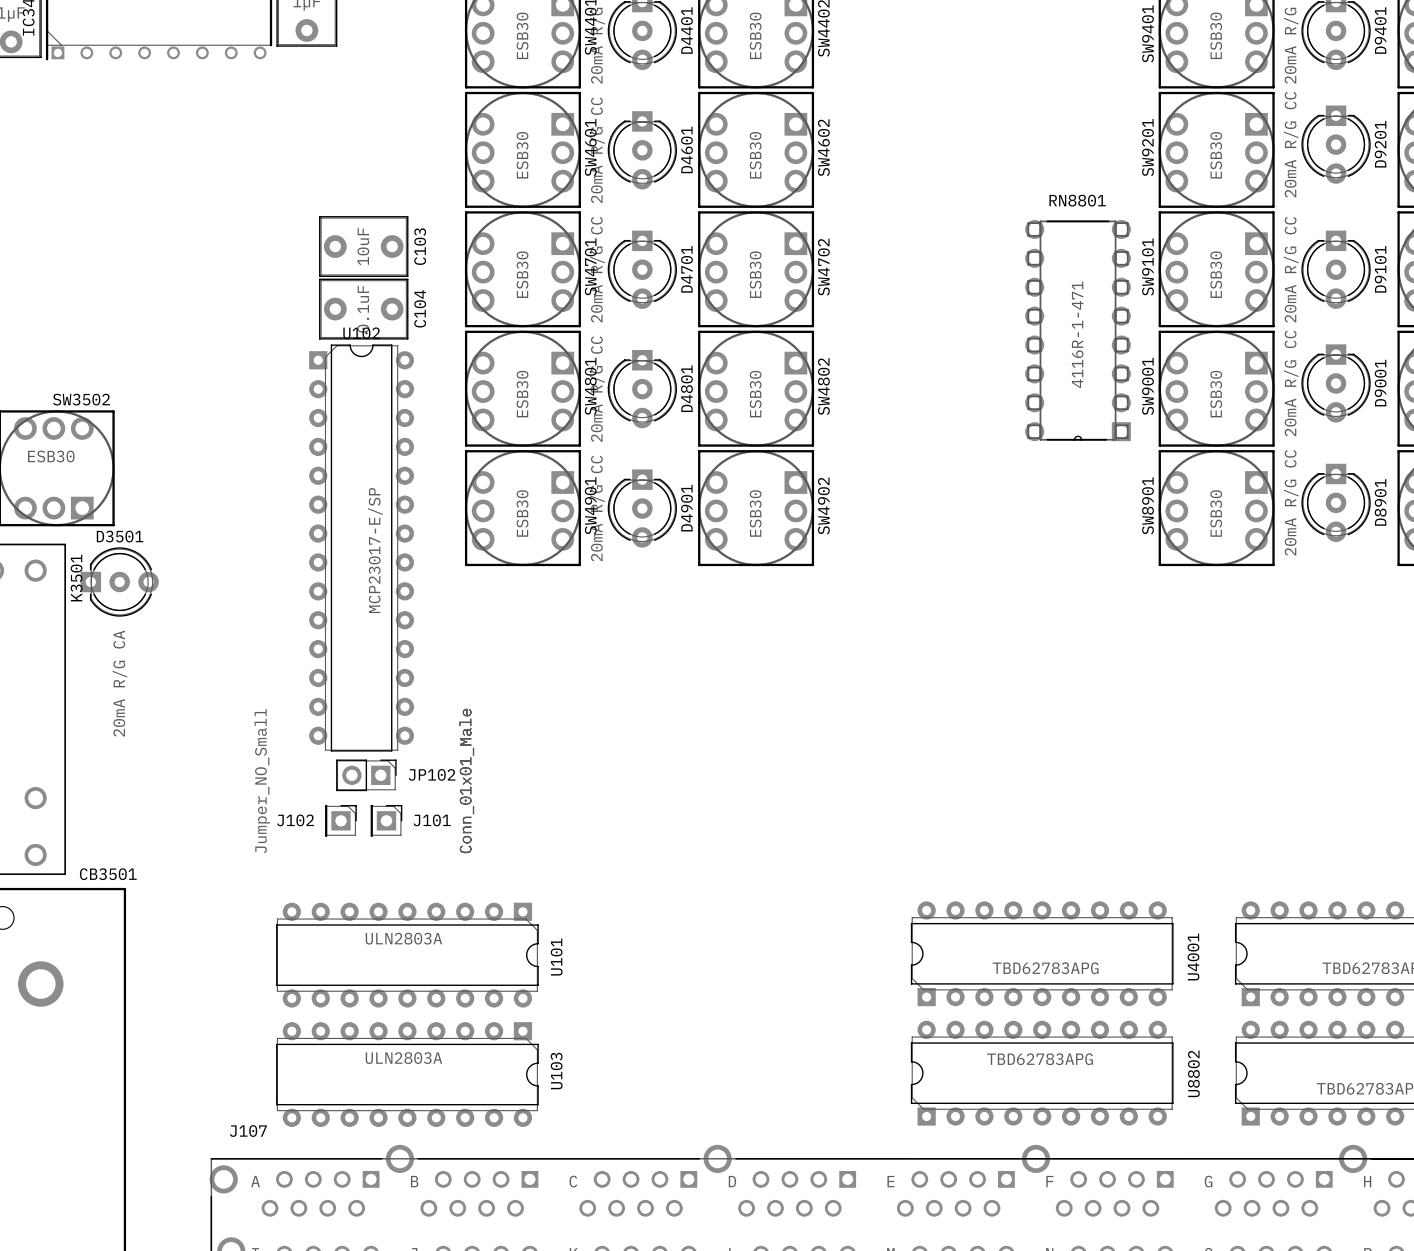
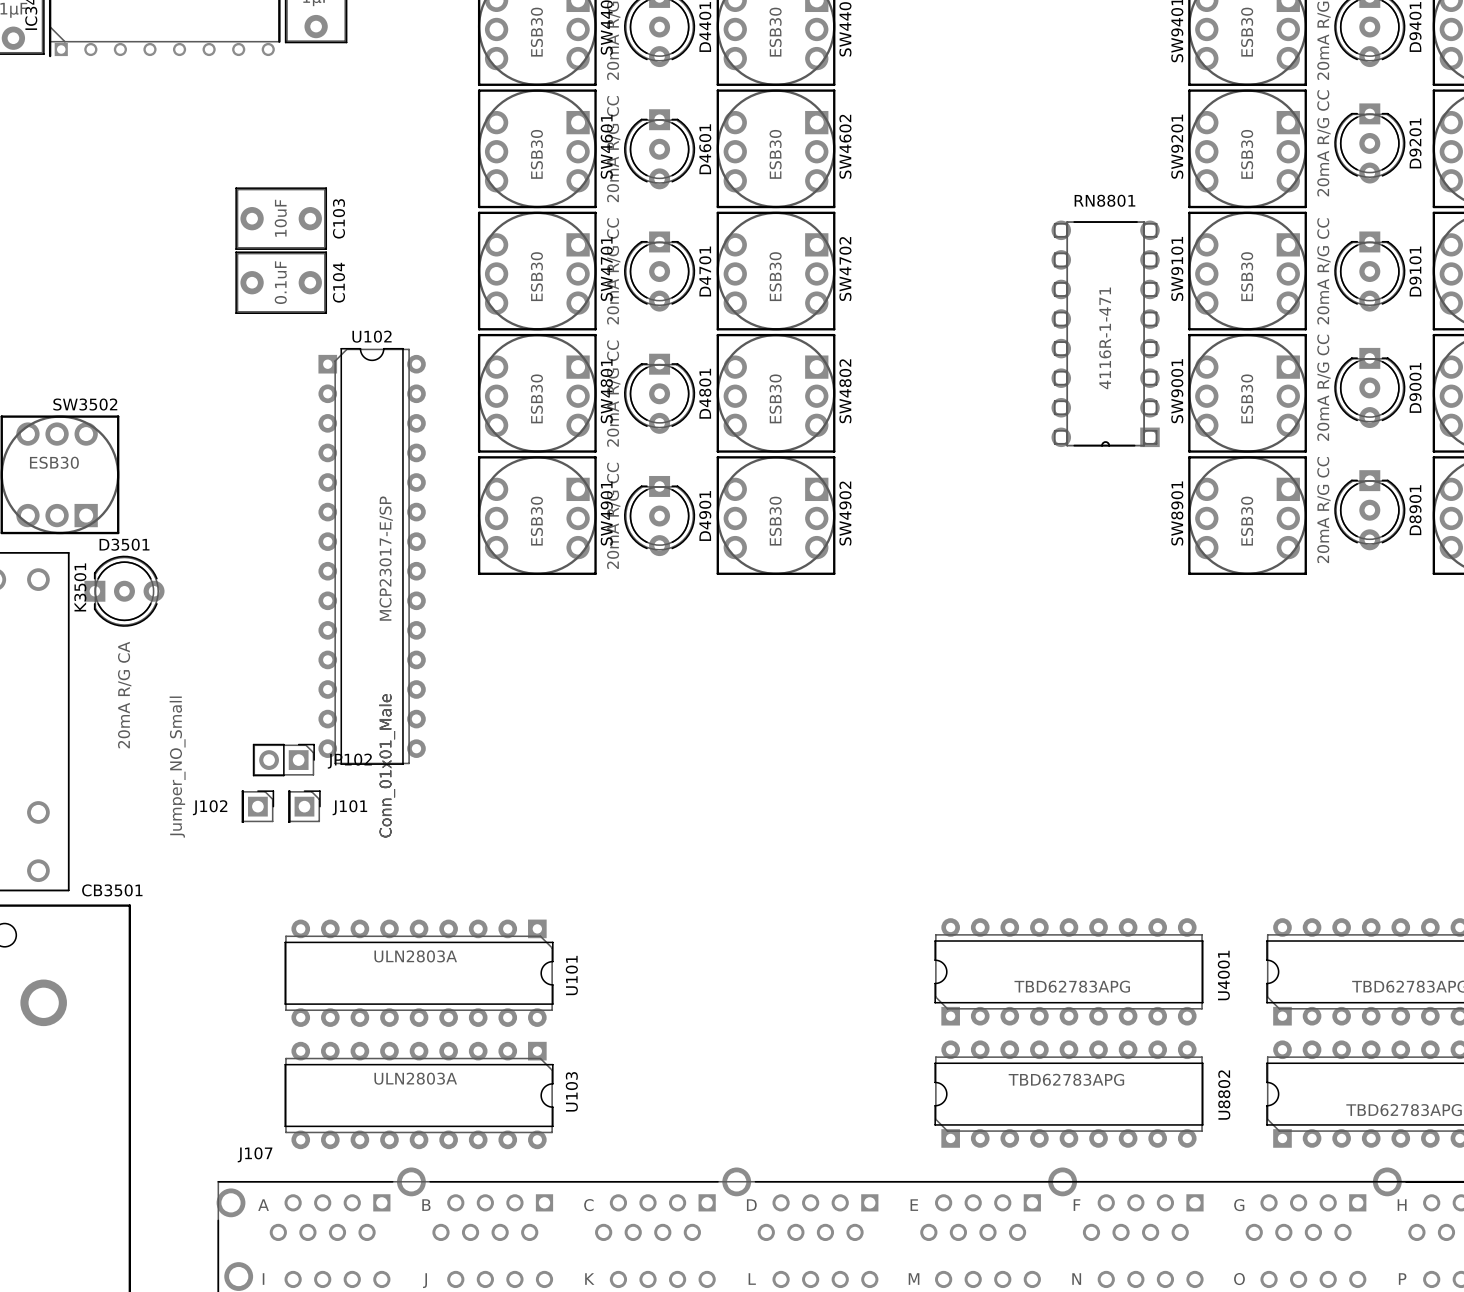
C103 position: (363, 246) -> (281, 218)
C104 position: (363, 309) -> (281, 282)
JP102 position: (366, 775) -> (283, 760)
J102 position: (341, 820) -> (257, 806)
J101 position: (386, 820) -> (304, 806)

